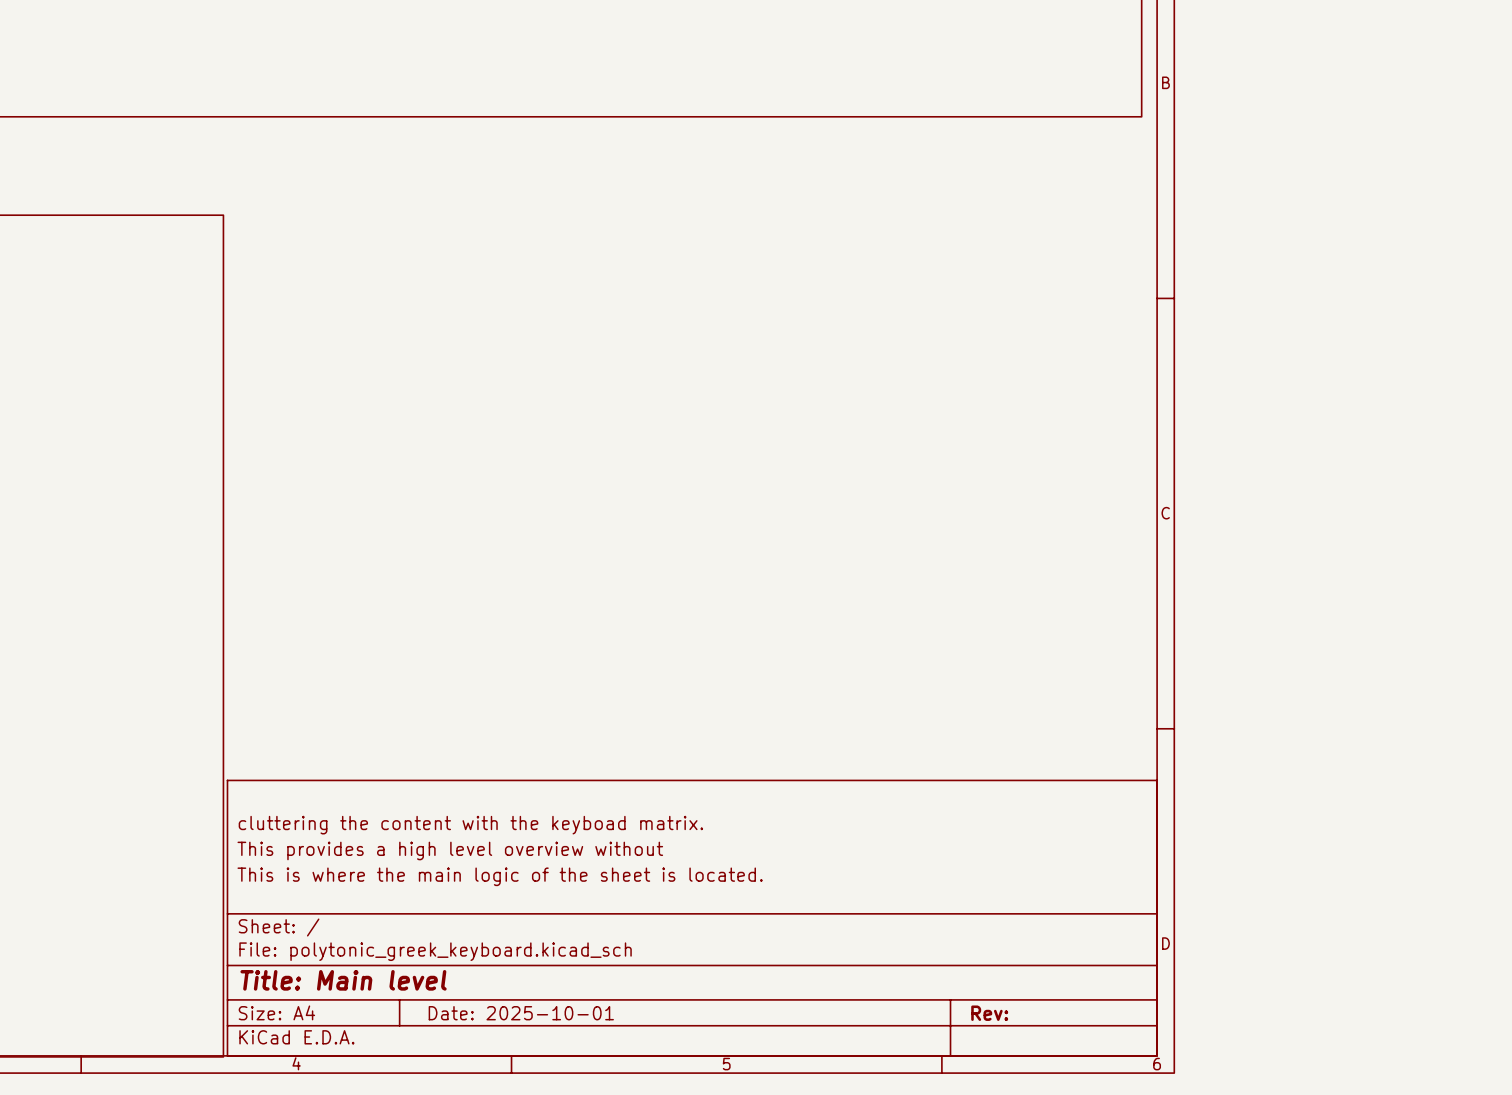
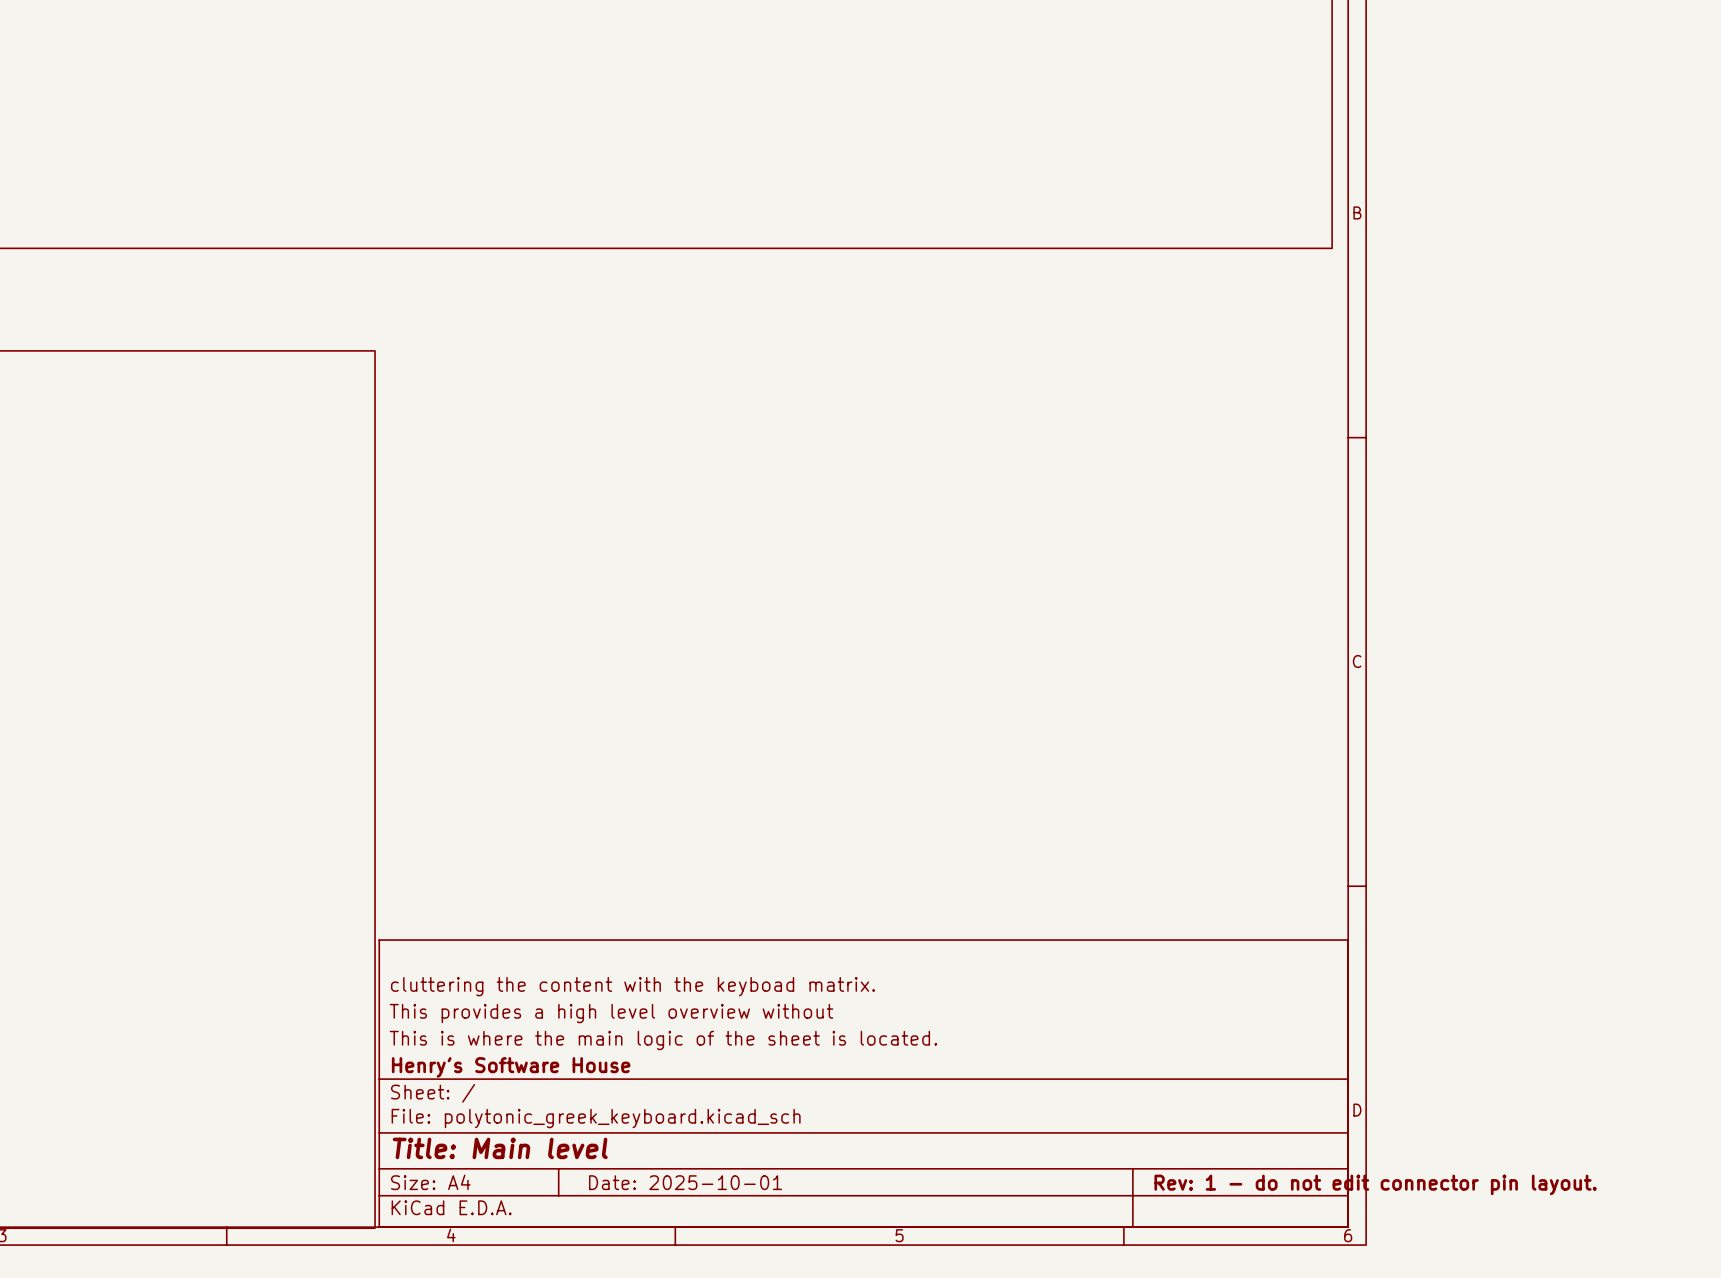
title block: none -> Henry's Software House (511, 1067)
title block: Rev: (989, 1013) -> Rev: 1 - do not edit connector pin layout. (1375, 1184)

